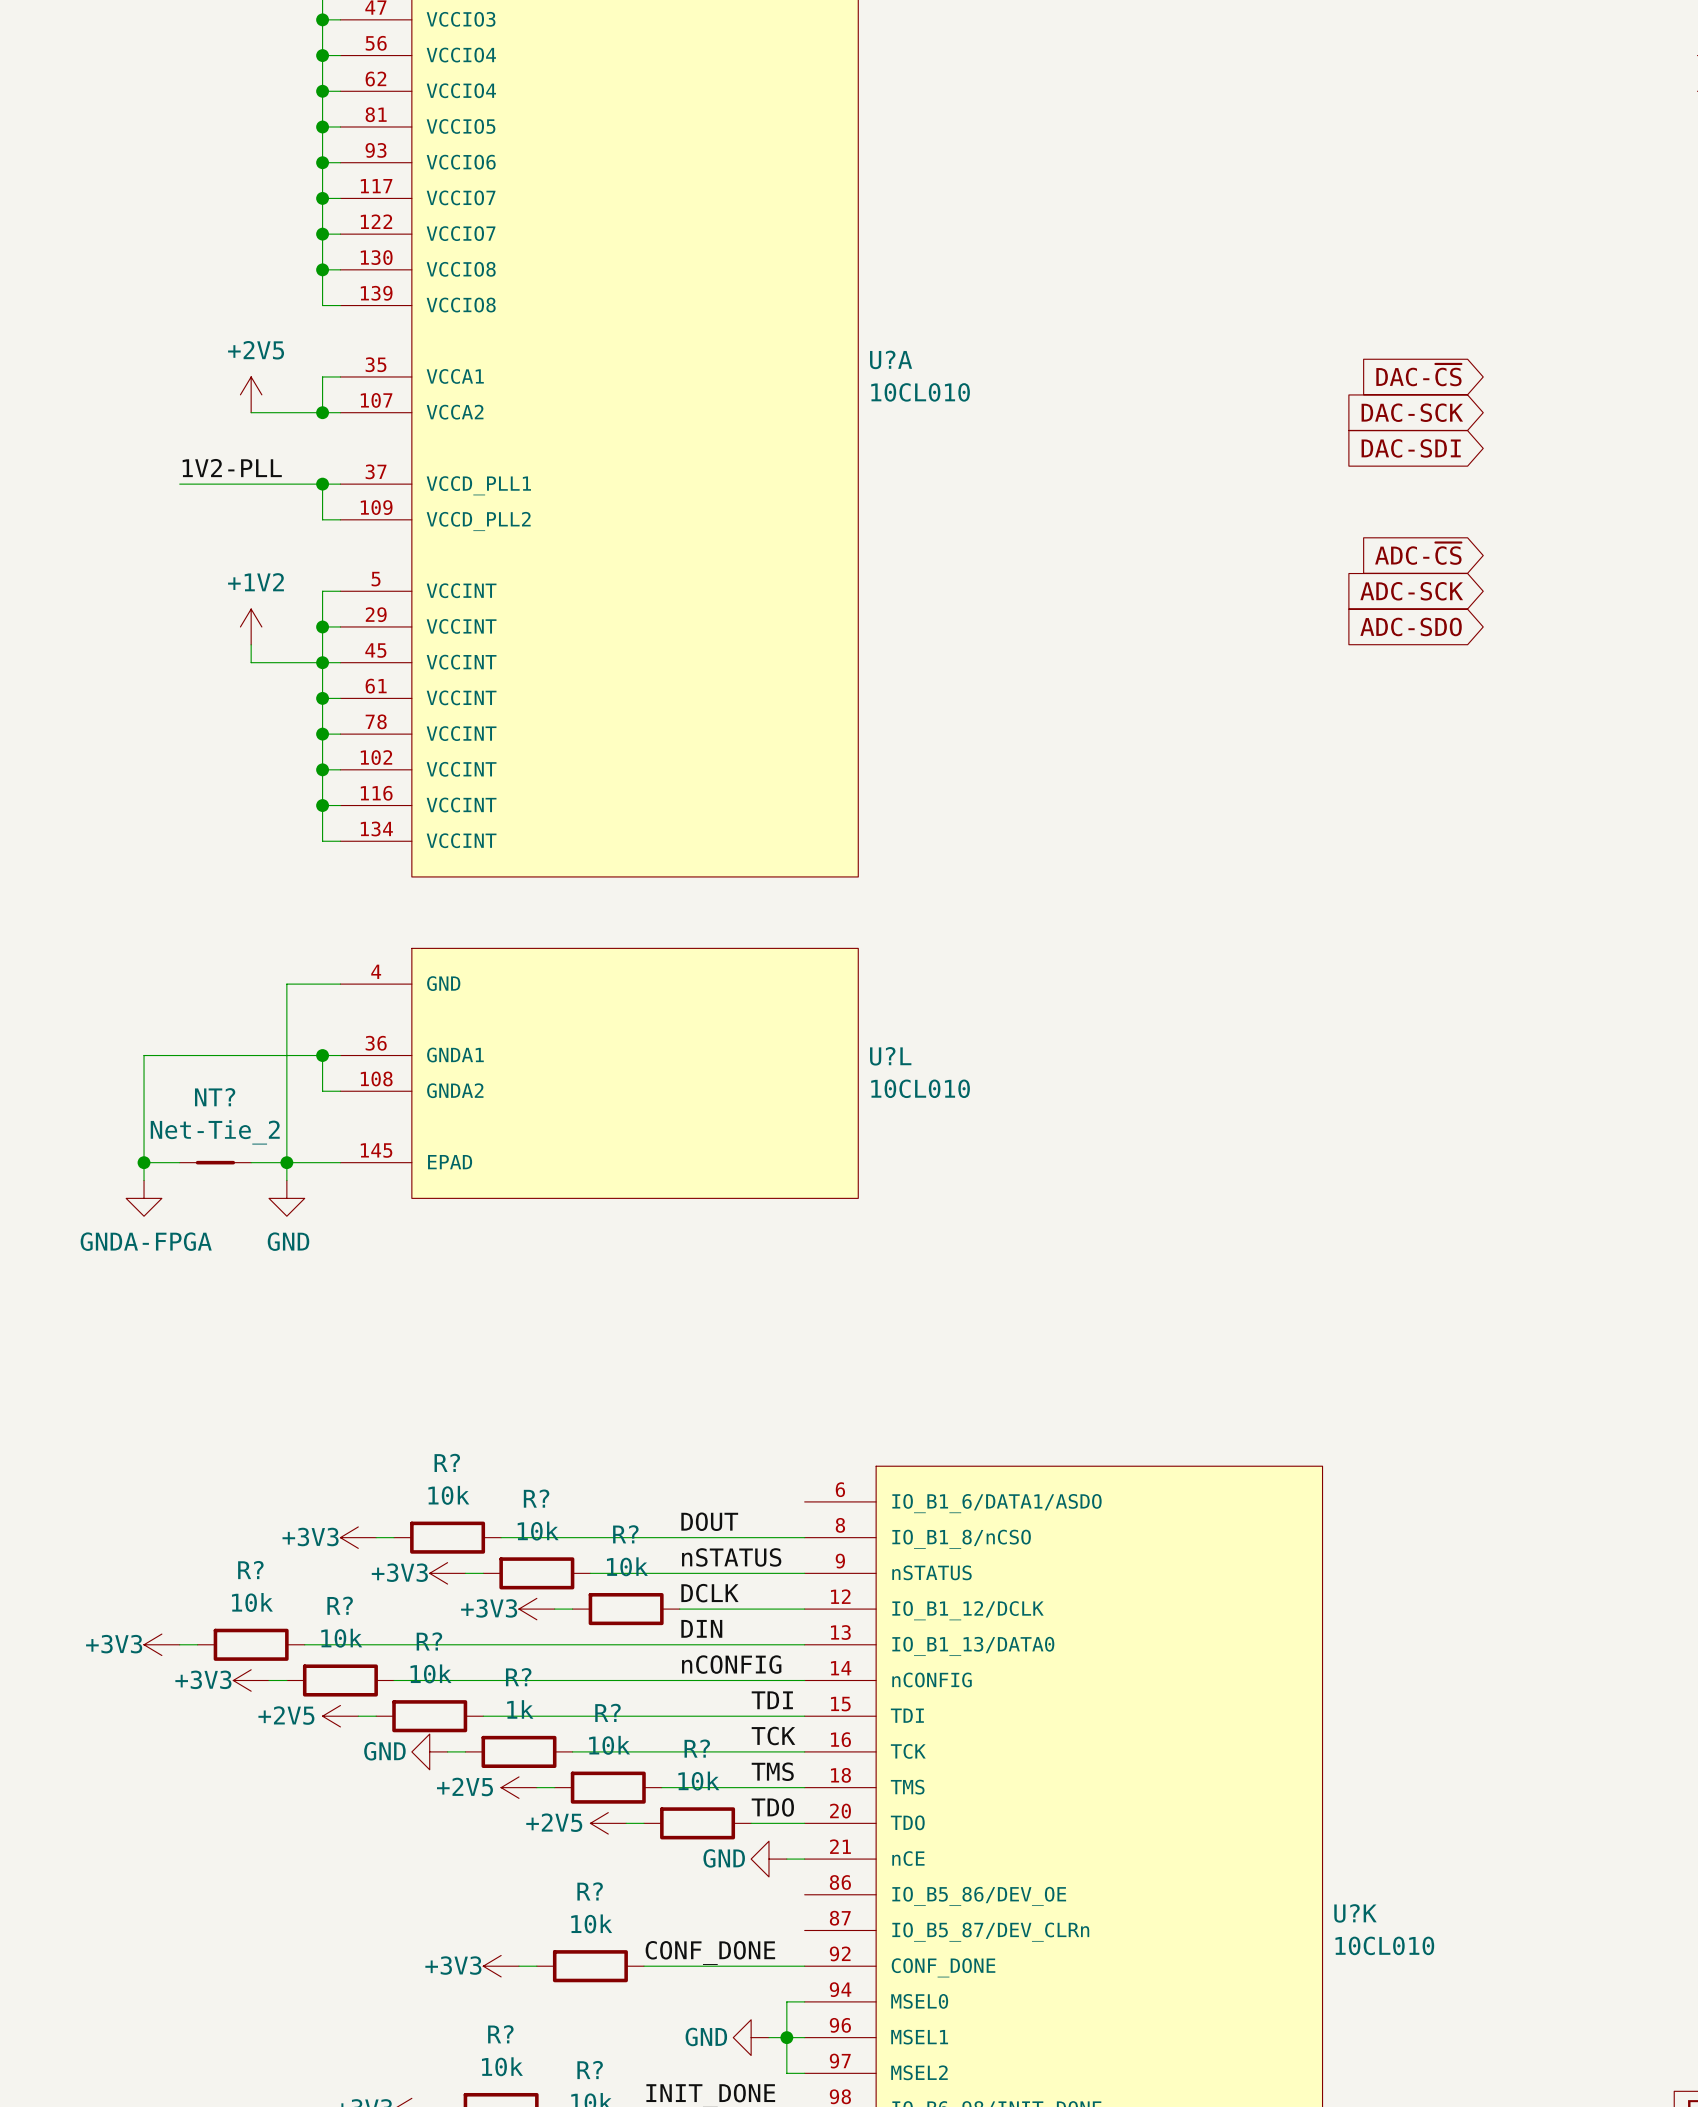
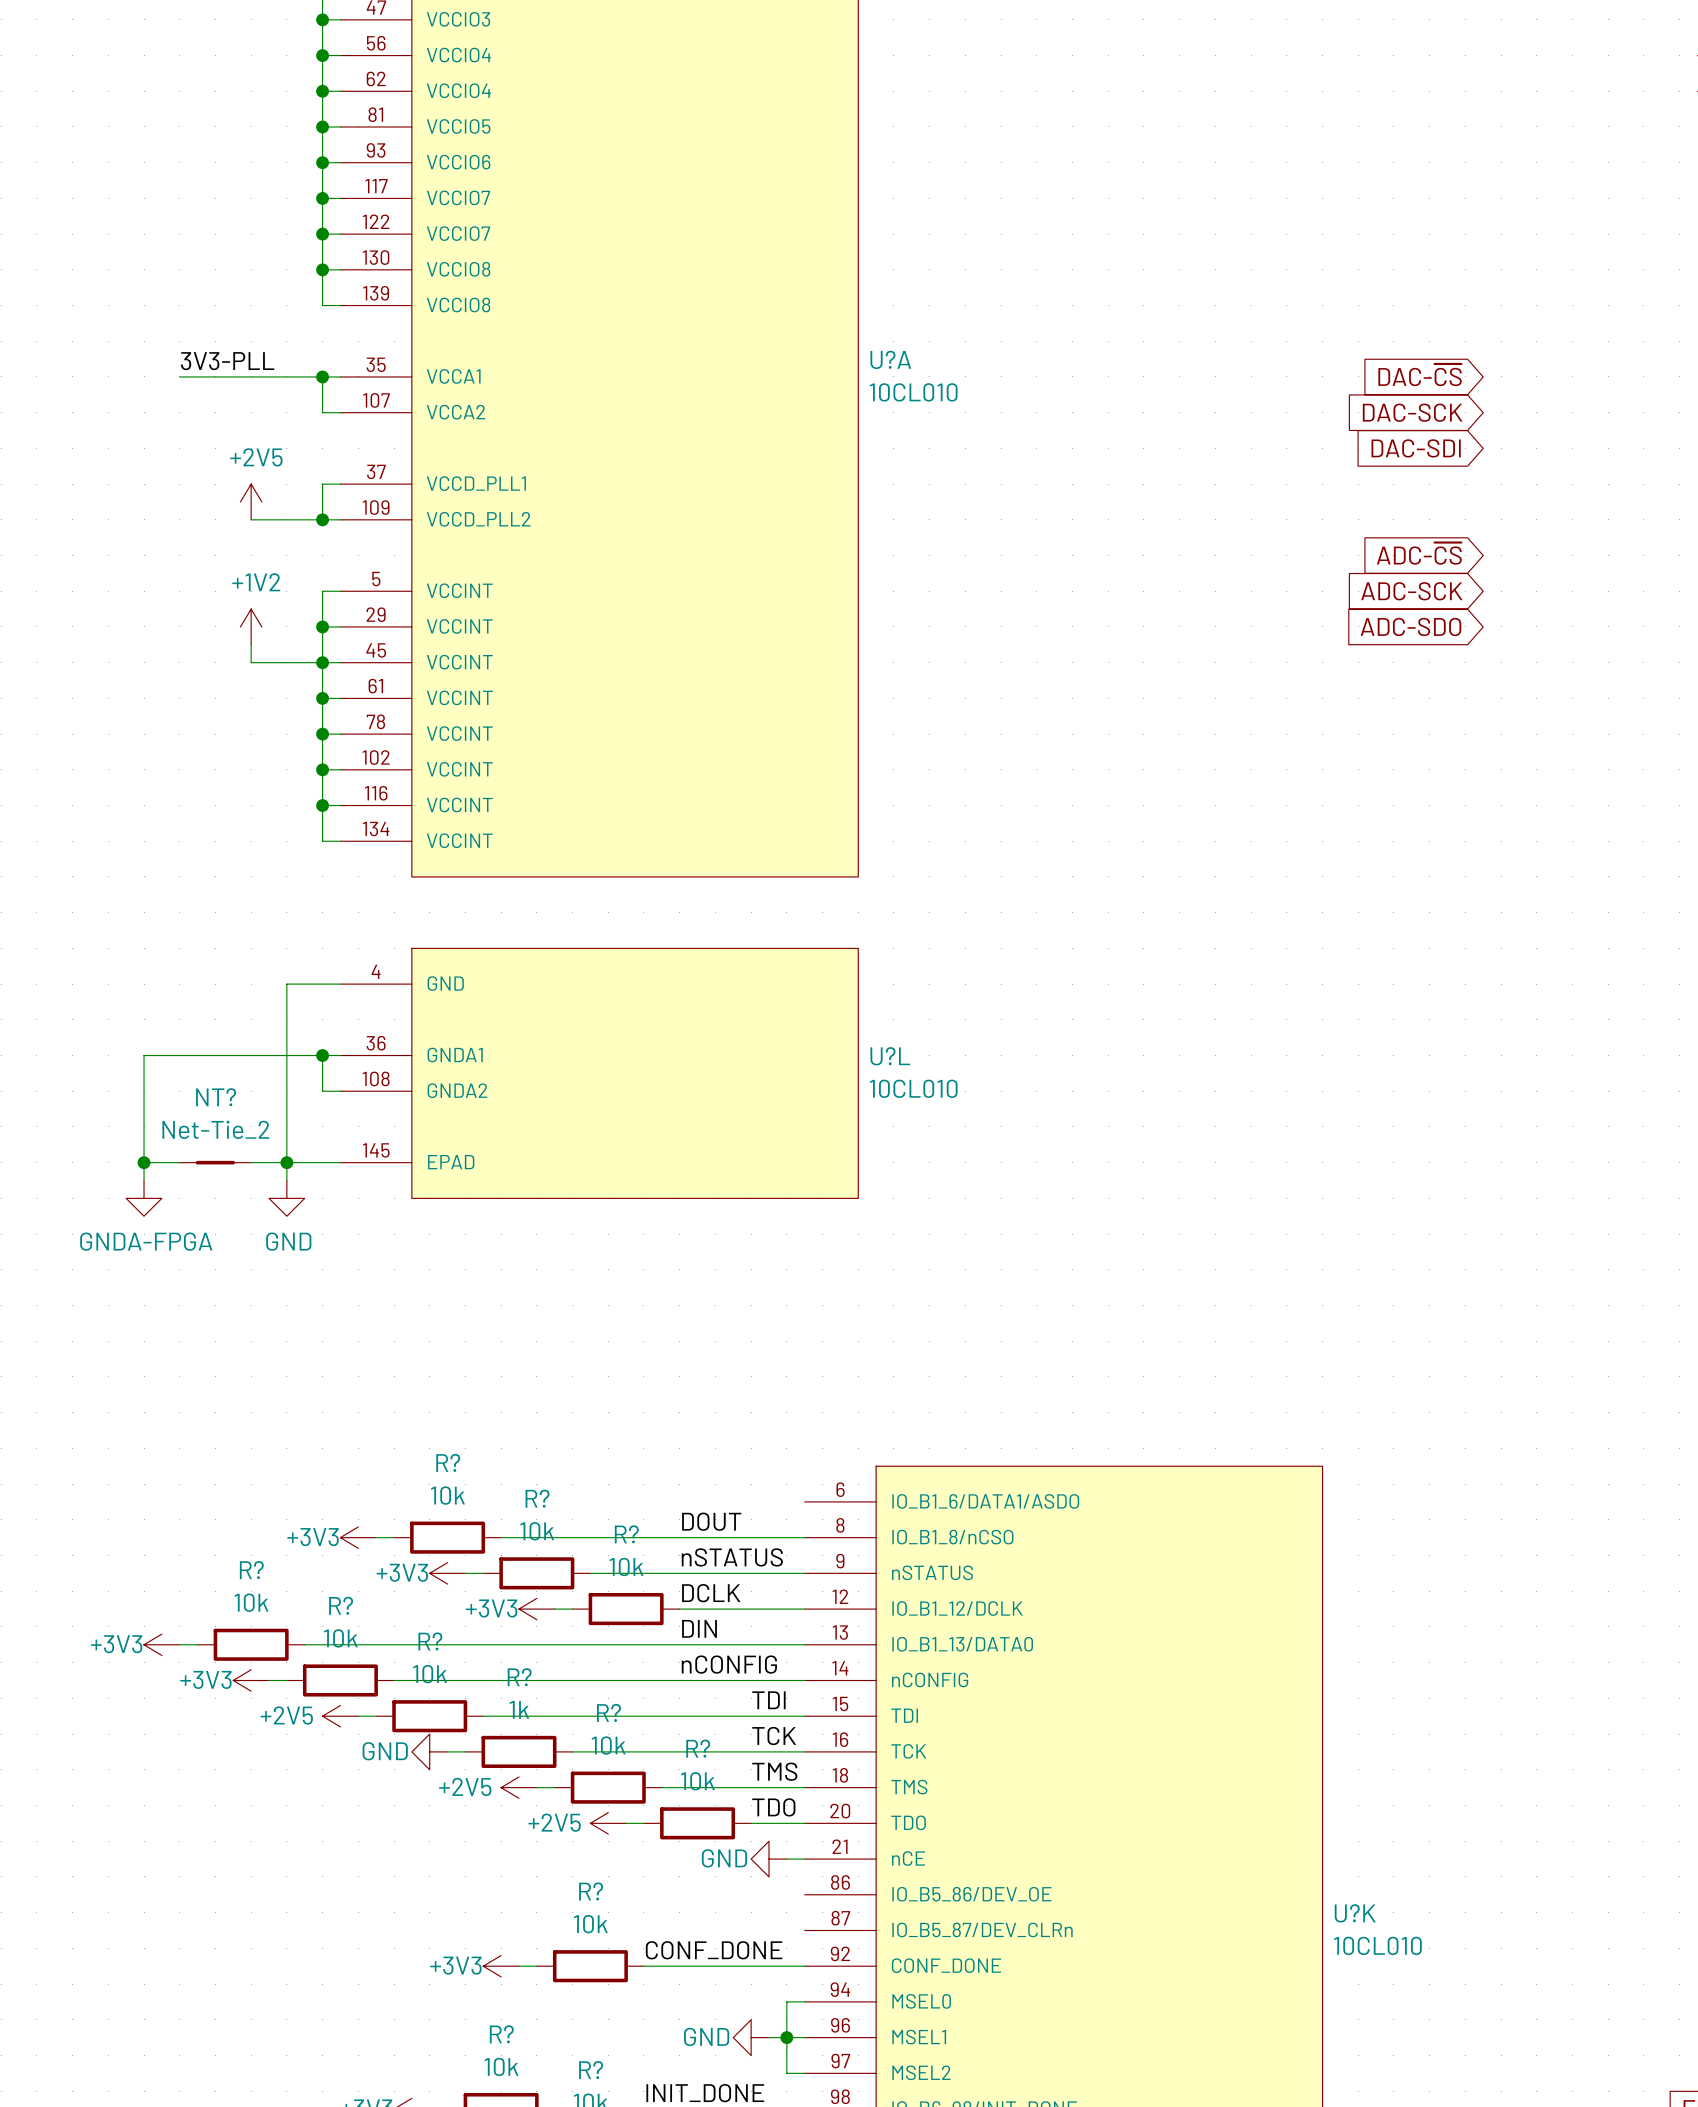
label: none -> 3V3-PLL (227, 361)
power symbol position: +2V5 (251, 394) -> +2V5 (251, 501)
wire: (251, 412) (322, 412) -> (251, 519) (322, 519)
junction position: (322, 412) -> (322, 376)
label: 1V2-PLL (232, 468) -> none
wire: (179, 484) (322, 484) -> (179, 376) (322, 376)
junction position: (322, 484) -> (322, 519)

